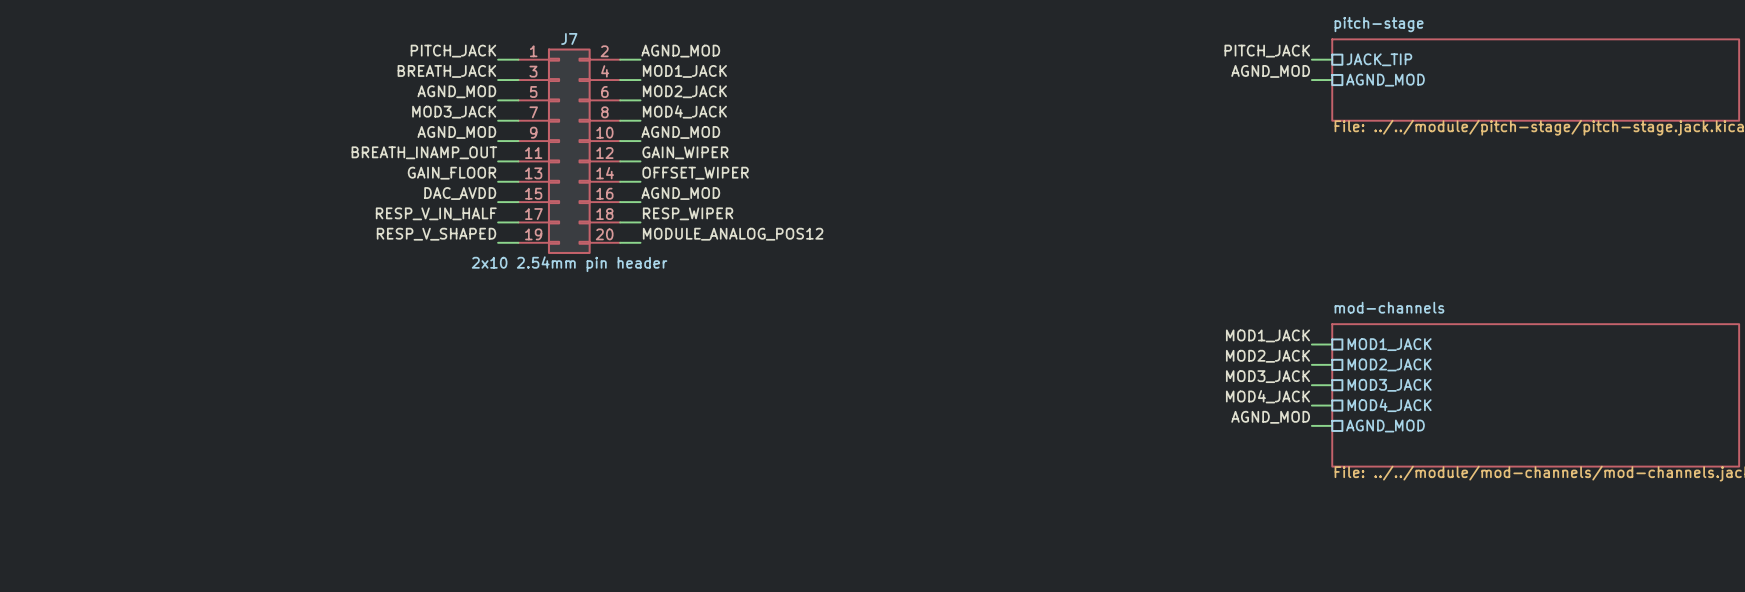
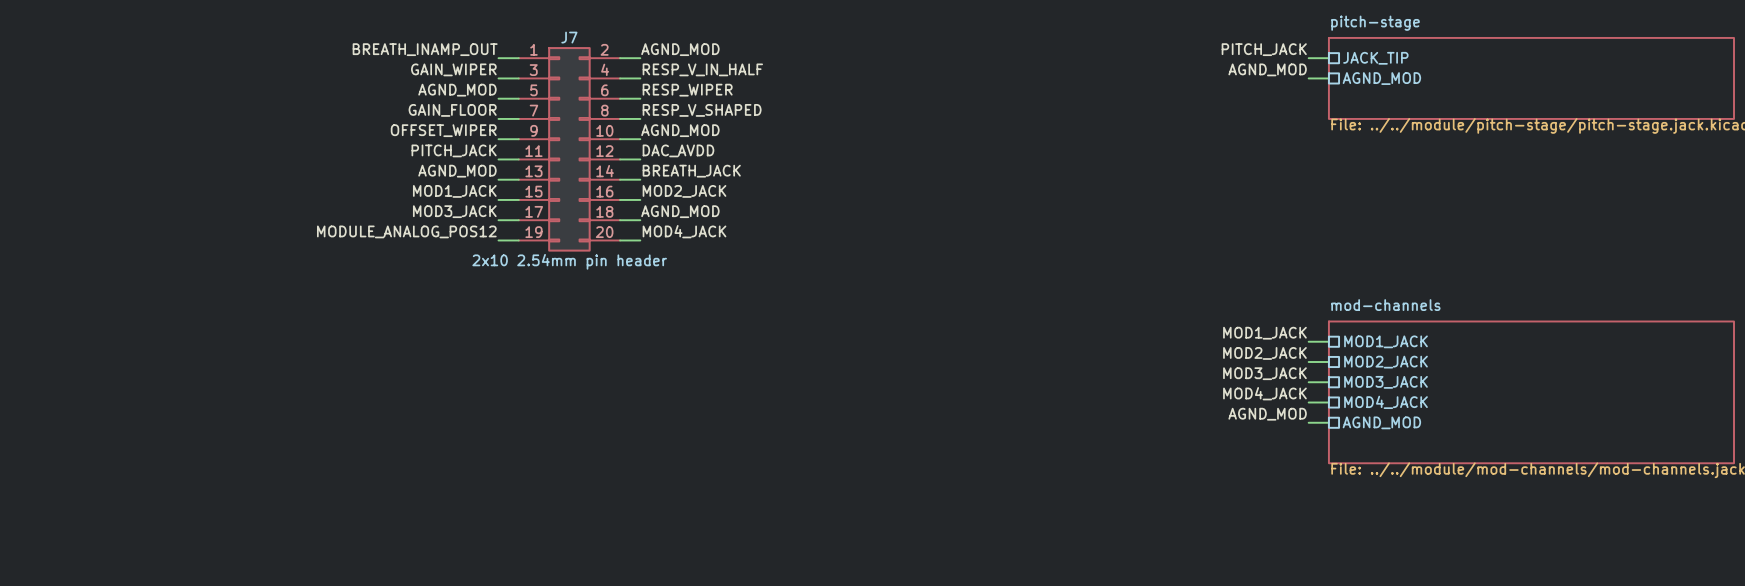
label: PITCH_JACK (453, 51) -> BREATH_INAMP_OUT (425, 49)
label: BREATH_JACK (446, 71) -> GAIN_WIPER (453, 69)
label: MOD1_JACK (684, 71) -> RESP_V_IN_HALF (702, 69)
label: MOD2_JACK (684, 91) -> RESP_WIPER (687, 90)
label: MOD4_JACK (684, 111) -> RESP_V_SHAPED (702, 110)
label: MOD3_JACK (454, 112) -> GAIN_FLOOR (452, 110)
label: AGND_MOD (456, 132) -> OFFSET_WIPER (443, 130)
label: BREATH_INAMP_OUT (424, 152) -> PITCH_JACK (454, 150)
label: GAIN_WIPER (685, 152) -> DAC_AVDD (678, 150)
label: GAIN_FLOOR (452, 173) -> AGND_MOD (457, 171)
label: OFFSET_WIPER (695, 173) -> BREATH_JACK (691, 171)
label: DAC_AVDD (460, 193) -> MOD1_JACK (454, 191)
label: AGND_MOD (680, 193) -> MOD2_JACK (684, 191)
label: RESP_V_IN_HALF (436, 213) -> MOD3_JACK (454, 211)
label: RESP_WIPER (688, 213) -> AGND_MOD (680, 211)
label: RESP_V_SHAPED (436, 234) -> MODULE_ANALOG_POS12 (406, 231)
label: MODULE_ANALOG_POS12 (733, 234) -> MOD4_JACK (684, 231)

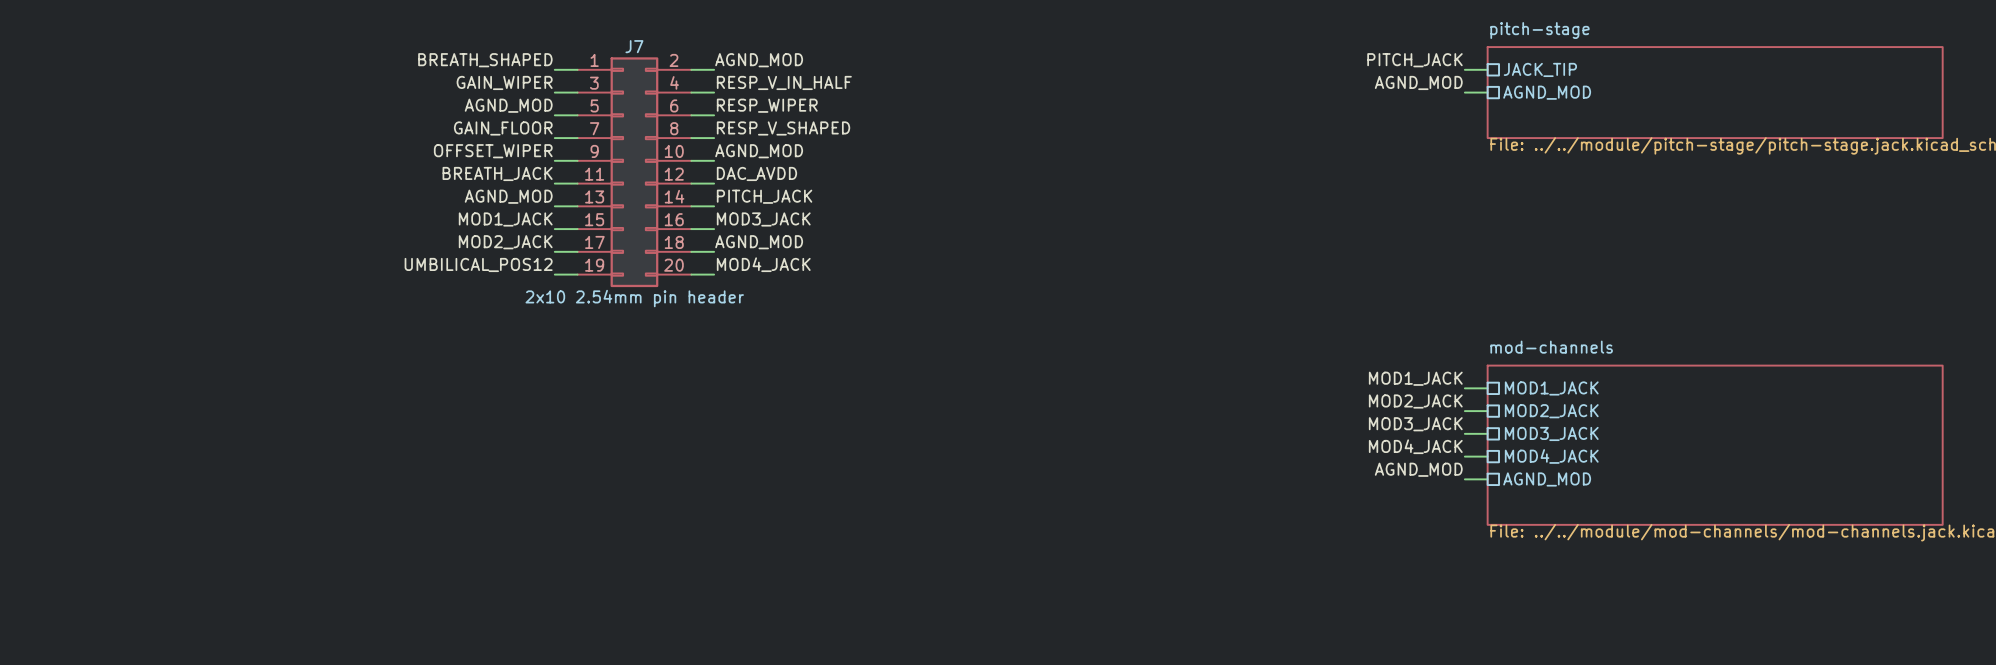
label: BREATH_INAMP_OUT (425, 49) -> BREATH_SHAPED (485, 60)
label: PITCH_JACK (454, 150) -> BREATH_JACK (497, 173)
label: BREATH_JACK (691, 171) -> PITCH_JACK (764, 196)
label: MOD2_JACK (684, 191) -> MOD3_JACK (763, 219)
label: MOD3_JACK (454, 211) -> MOD2_JACK (505, 242)
label: MODULE_ANALOG_POS12 (406, 231) -> UMBILICAL_POS12 (478, 264)

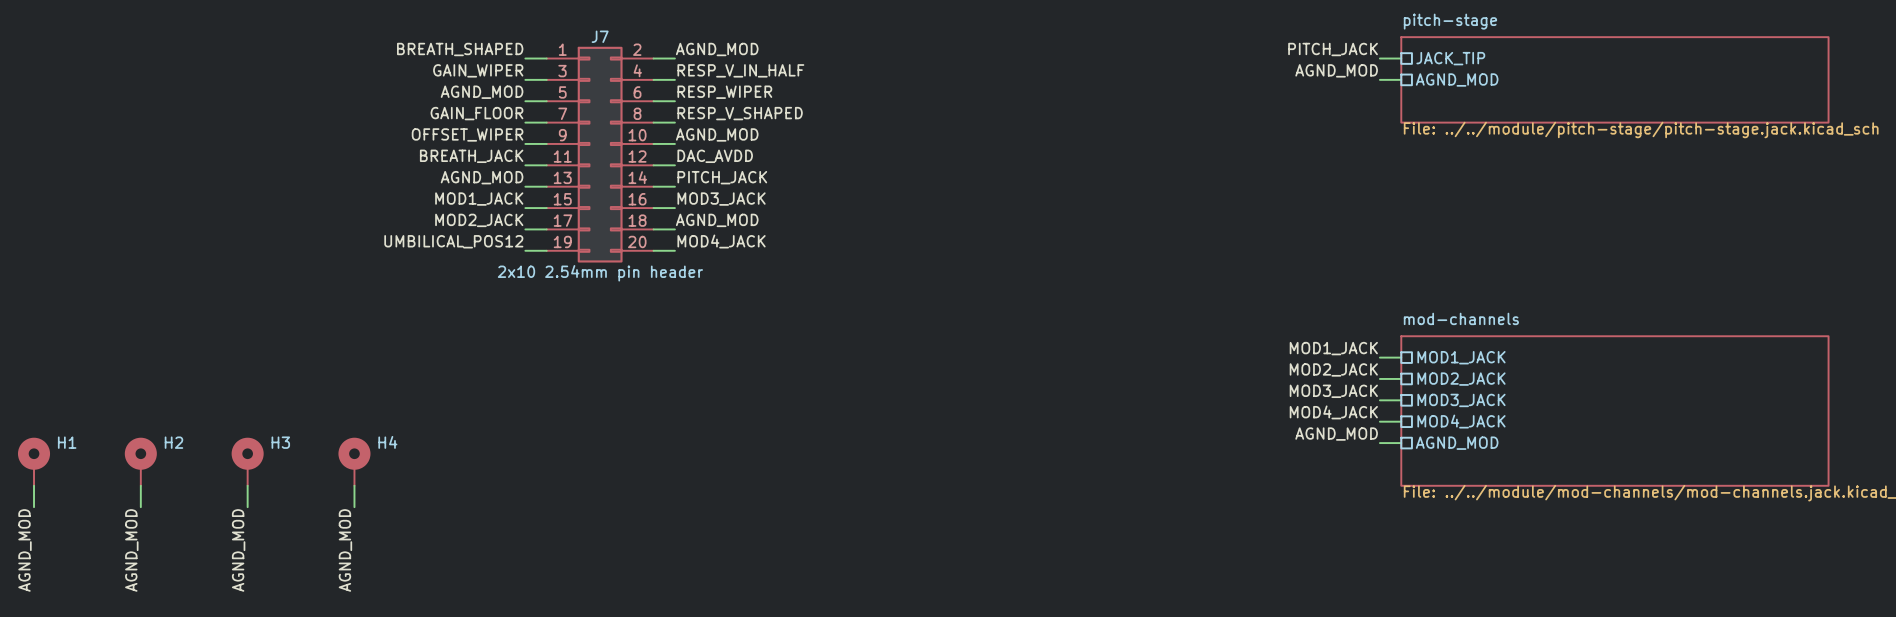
H1: none -> (34, 461)
H2: none -> (140, 461)
H3: none -> (247, 461)
H4: none -> (354, 461)
wire: none -> (34, 485) (34, 507)
wire: none -> (140, 485) (140, 507)
wire: none -> (247, 485) (247, 507)
wire: none -> (354, 485) (354, 507)
label: none -> AGND_MOD (24, 550)
label: none -> AGND_MOD (131, 550)
label: none -> AGND_MOD (238, 550)
label: none -> AGND_MOD (345, 550)

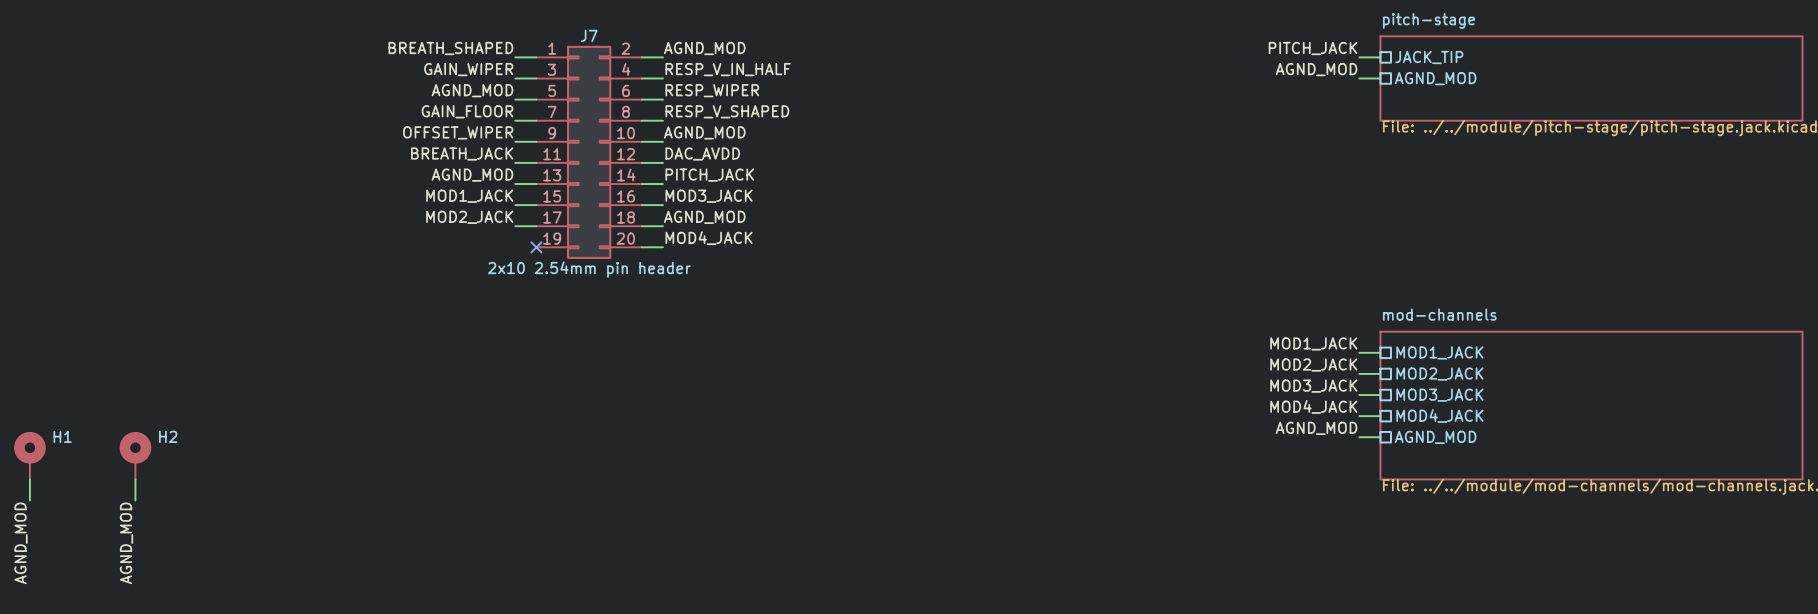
label: UMBILICAL_POS12 (453, 241) -> none
wire: (525, 250) (546, 250) -> none
no-connect mark: none -> (536, 247)
H3: (247, 461) -> none
H4: (354, 461) -> none
wire: (247, 485) (247, 507) -> none
wire: (354, 485) (354, 507) -> none
label: AGND_MOD (238, 550) -> none
label: AGND_MOD (345, 550) -> none

